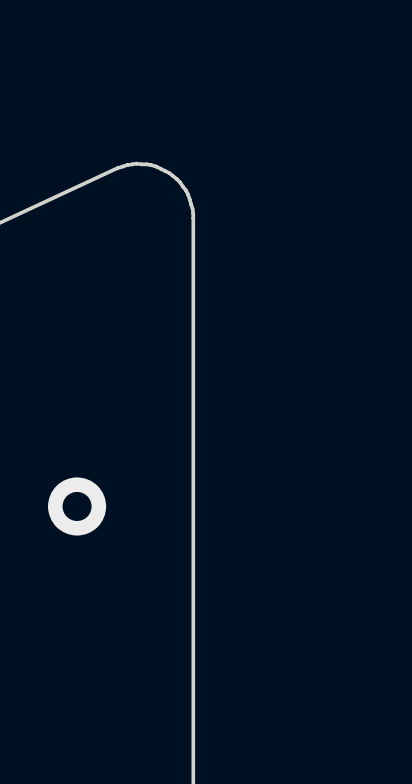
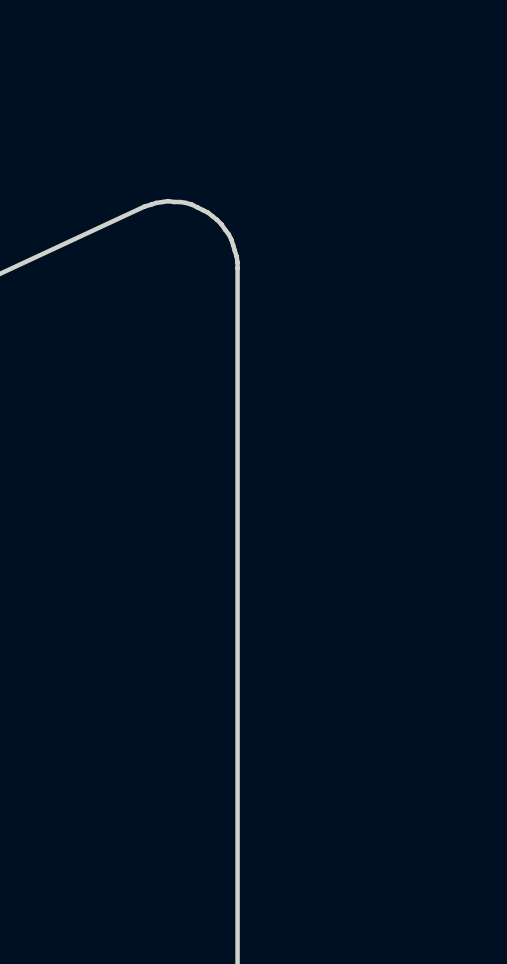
via: (77, 506) -> none

